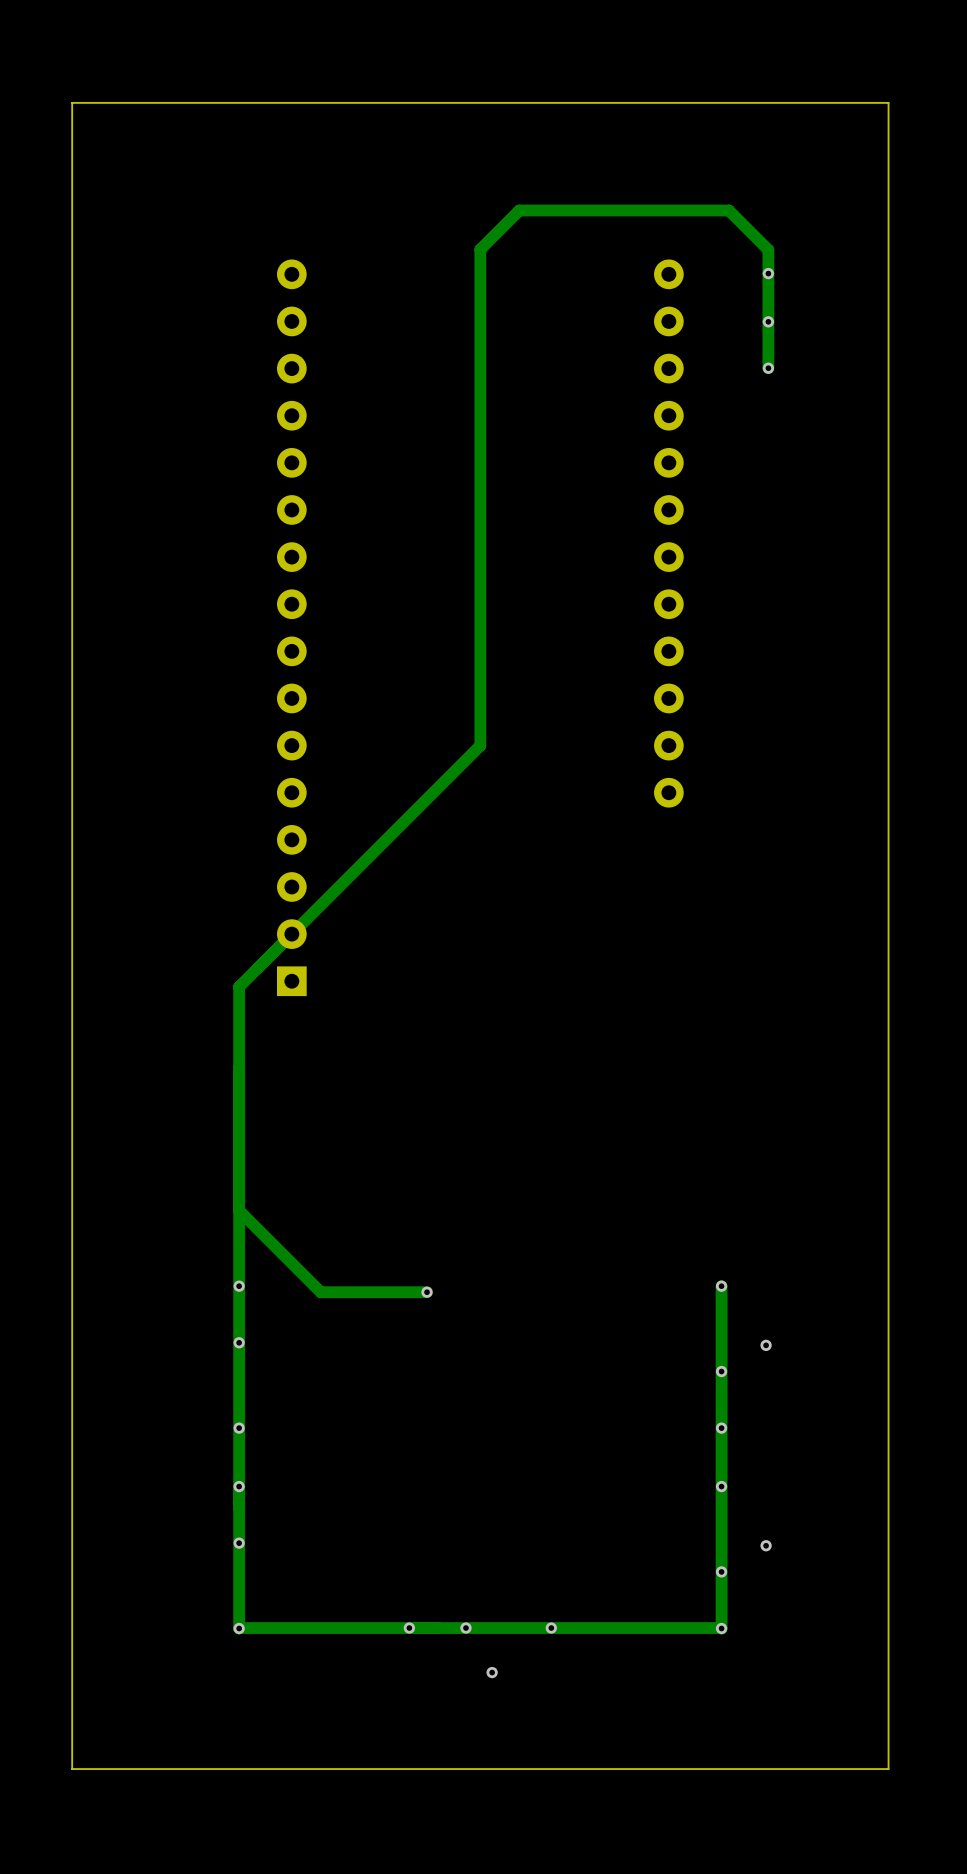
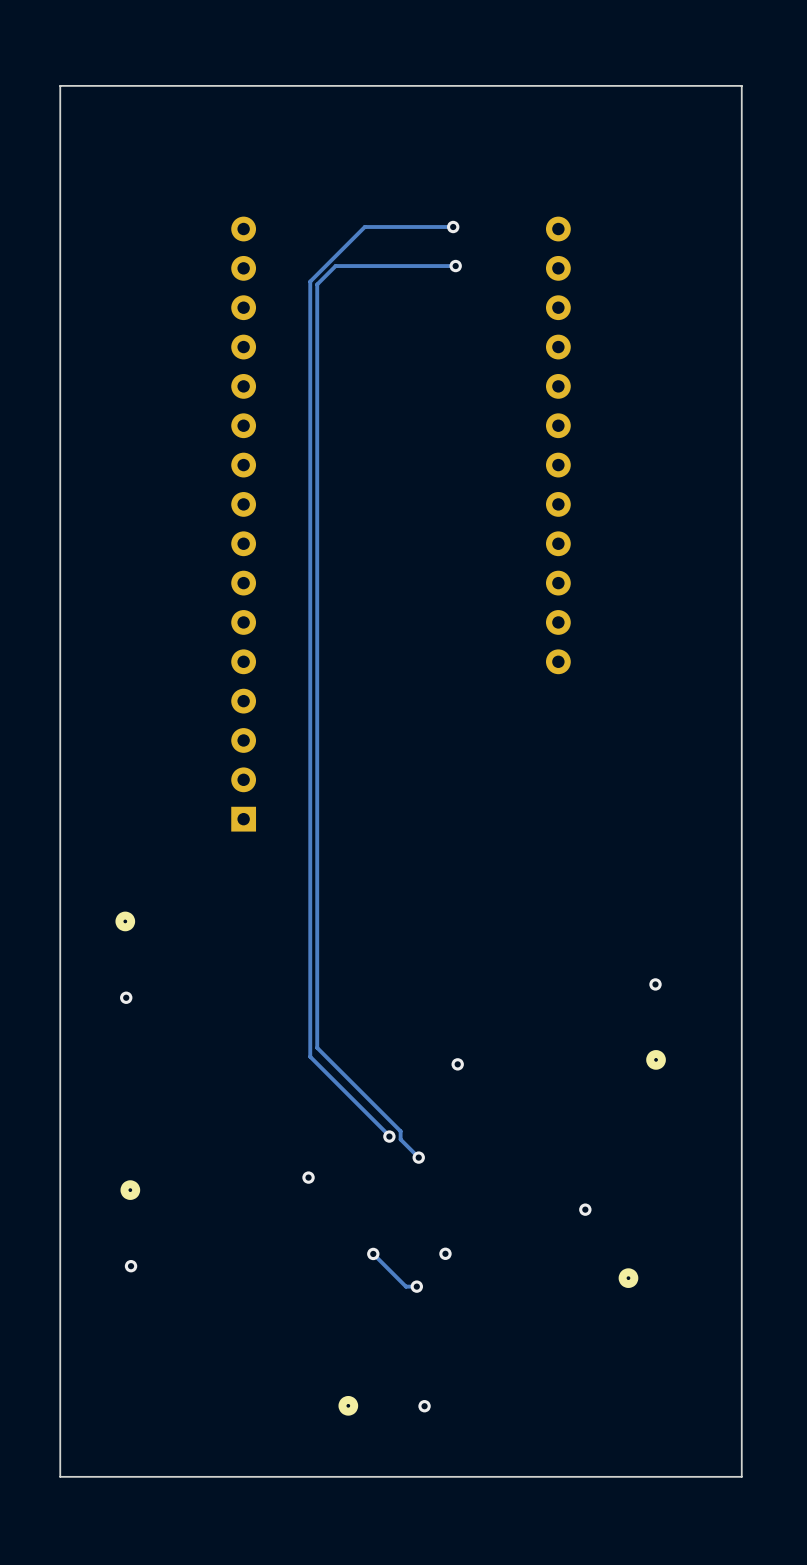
track: none -> (453, 227) (364, 227) (310, 281) (310, 1056) (389, 1136)
via: none -> (453, 227)
via: (768, 273) -> none
track: none -> (455, 266) (335, 266) (317, 284) (317, 1047) (400, 1131) (400, 1139) (418, 1157)
via: none -> (455, 266)
via: (768, 321) -> none
track: (768, 368) (768, 249) (728, 210) (519, 210) (480, 249) (480, 745) (239, 986) (239, 1628) (721, 1628) (721, 1286) -> none
via: (768, 368) -> none
part: none -> (125, 921)
via: none -> (655, 984)
via: none -> (126, 997)
track: (239, 1210) (320, 1292) (427, 1292) -> none
part: none -> (656, 1059)
via: none -> (457, 1064)
via: (239, 1286) -> none
via: (721, 1286) -> none
via: (427, 1292) -> none
via: (239, 1342) -> none
via: (766, 1345) -> none
via: none -> (389, 1136)
via: (721, 1371) -> none
via: none -> (418, 1157)
via: none -> (308, 1177)
part: none -> (130, 1190)
via: (239, 1428) -> none
via: (721, 1428) -> none
via: none -> (585, 1209)
via: (239, 1486) -> none
via: (721, 1486) -> none
via: none -> (445, 1253)
track: none -> (373, 1253) (405, 1286) (416, 1286)
via: none -> (373, 1253)
via: none -> (131, 1266)
part: none -> (628, 1278)
via: none -> (416, 1286)
via: (239, 1543) -> none
via: (766, 1545) -> none
via: (721, 1571) -> none
via: (239, 1628) -> none
via: (409, 1628) -> none
via: (465, 1628) -> none
via: (551, 1628) -> none
via: (721, 1628) -> none
via: (492, 1672) -> none
part: none -> (348, 1405)
via: none -> (424, 1406)

